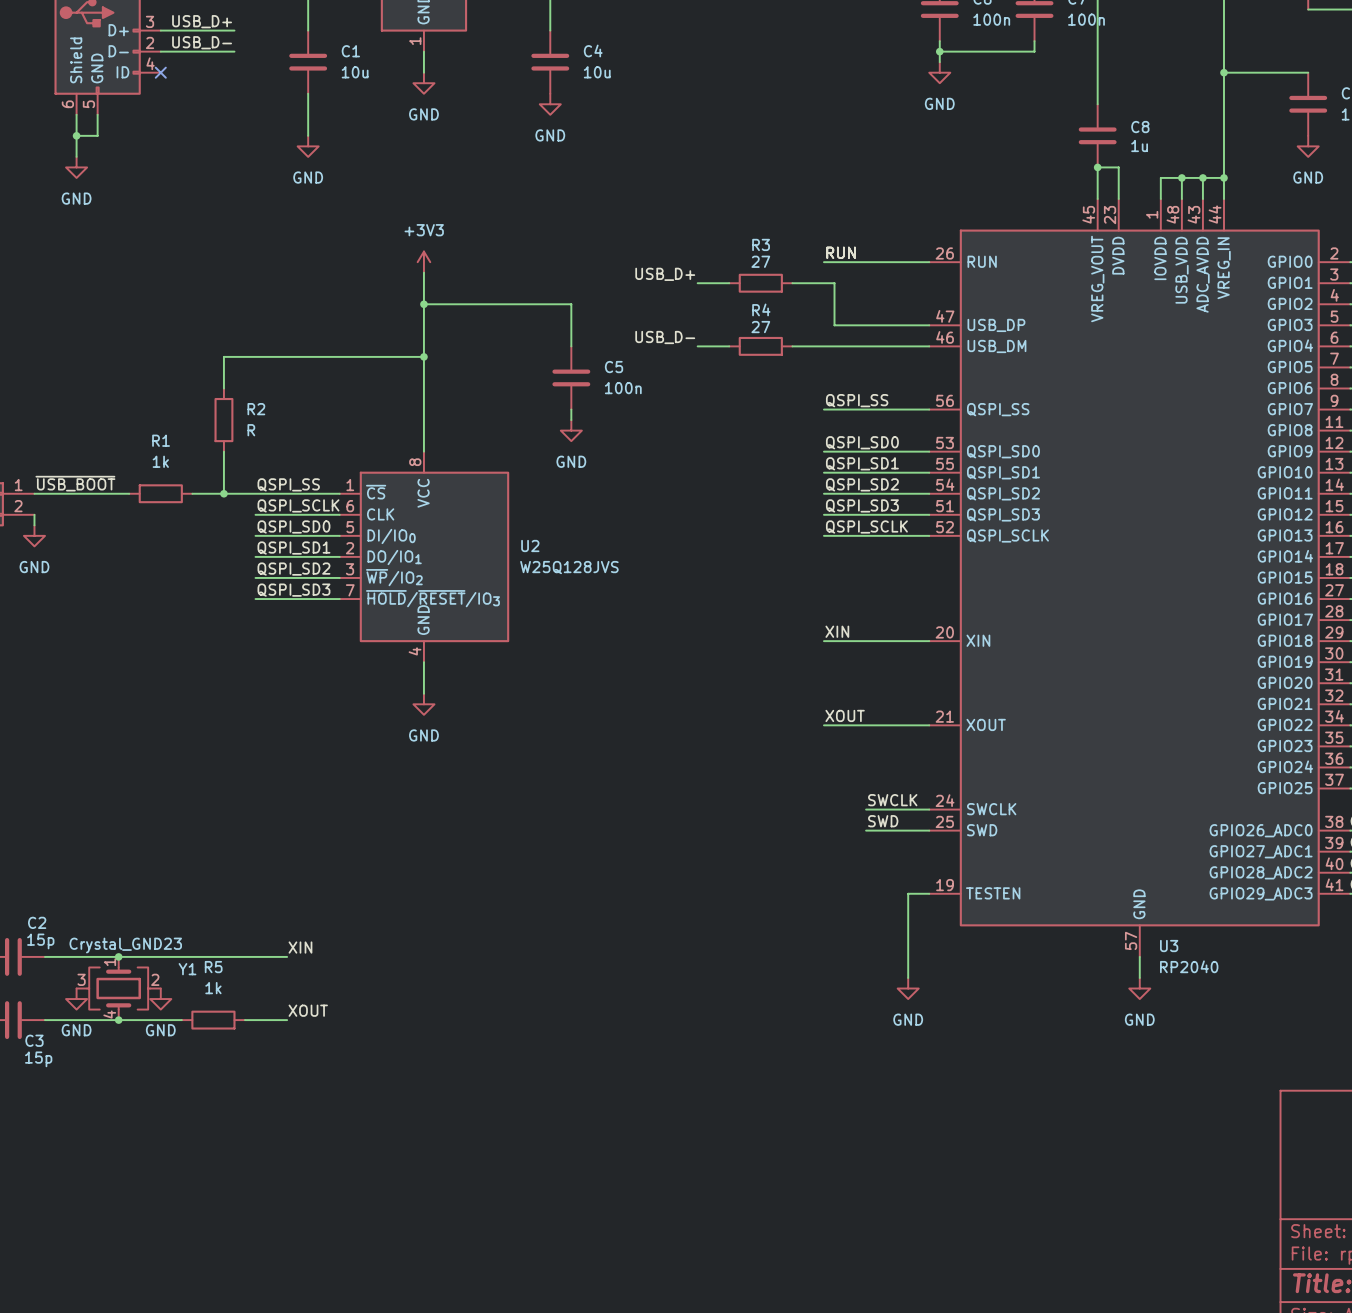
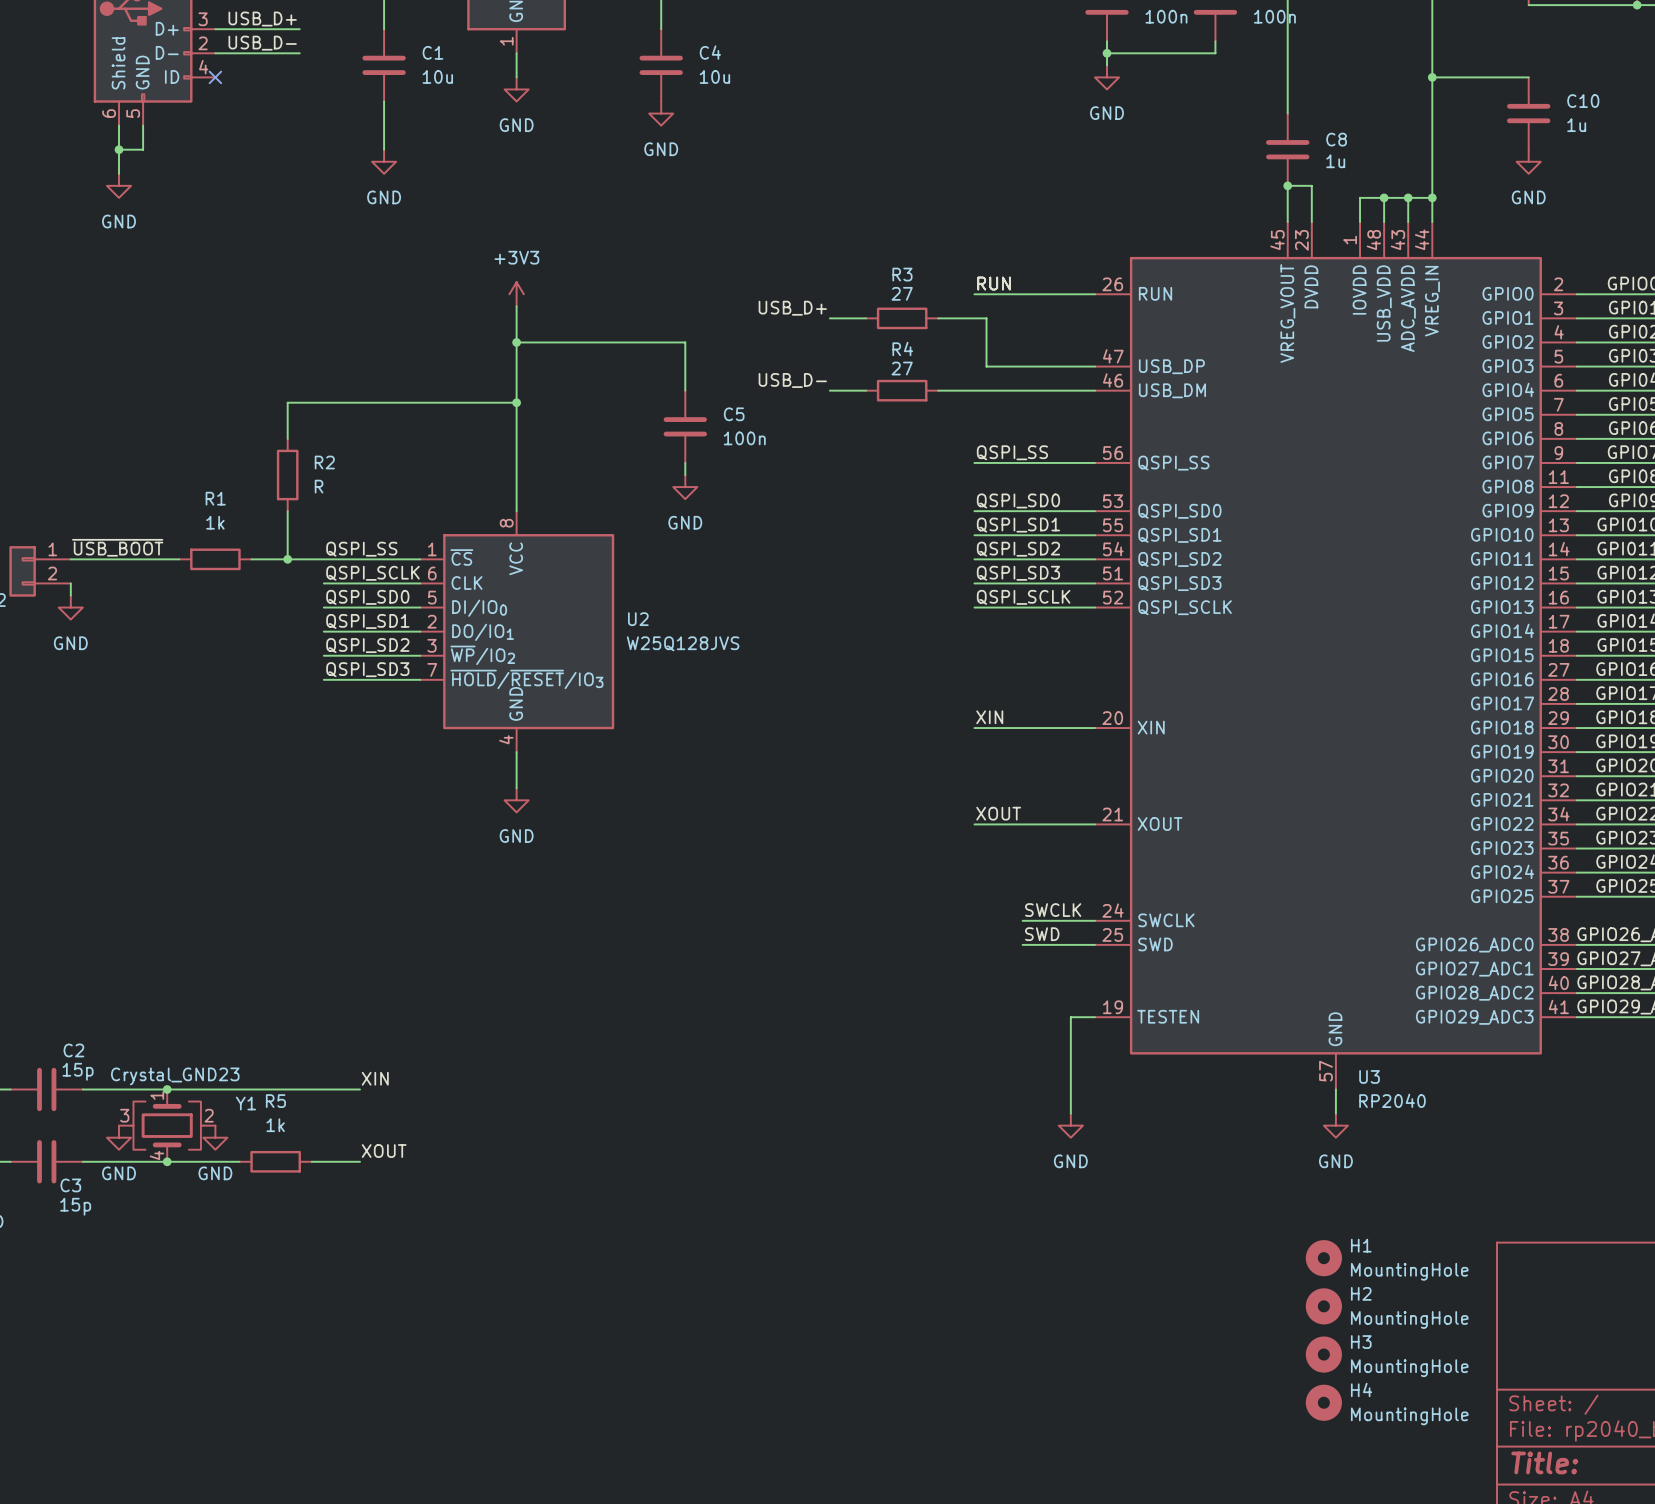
H1: none -> MountingHole (1323, 1258)
H2: none -> MountingHole (1323, 1306)
H3: none -> MountingHole (1323, 1354)
H4: none -> MountingHole (1323, 1402)

